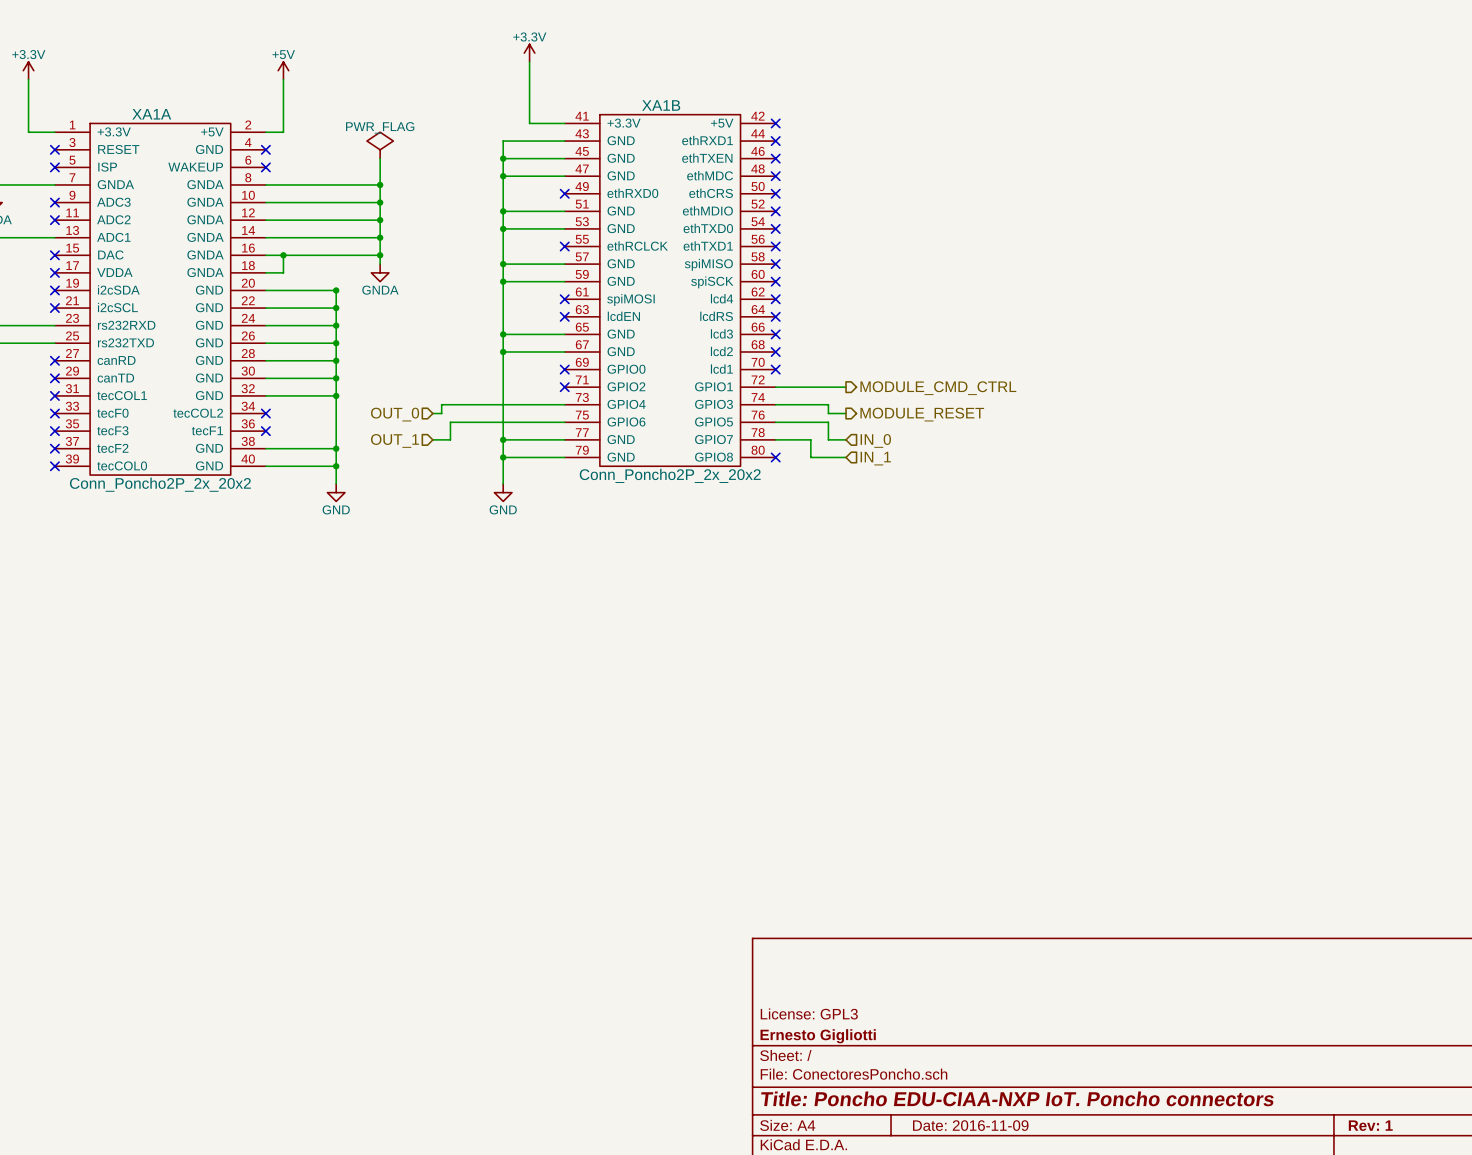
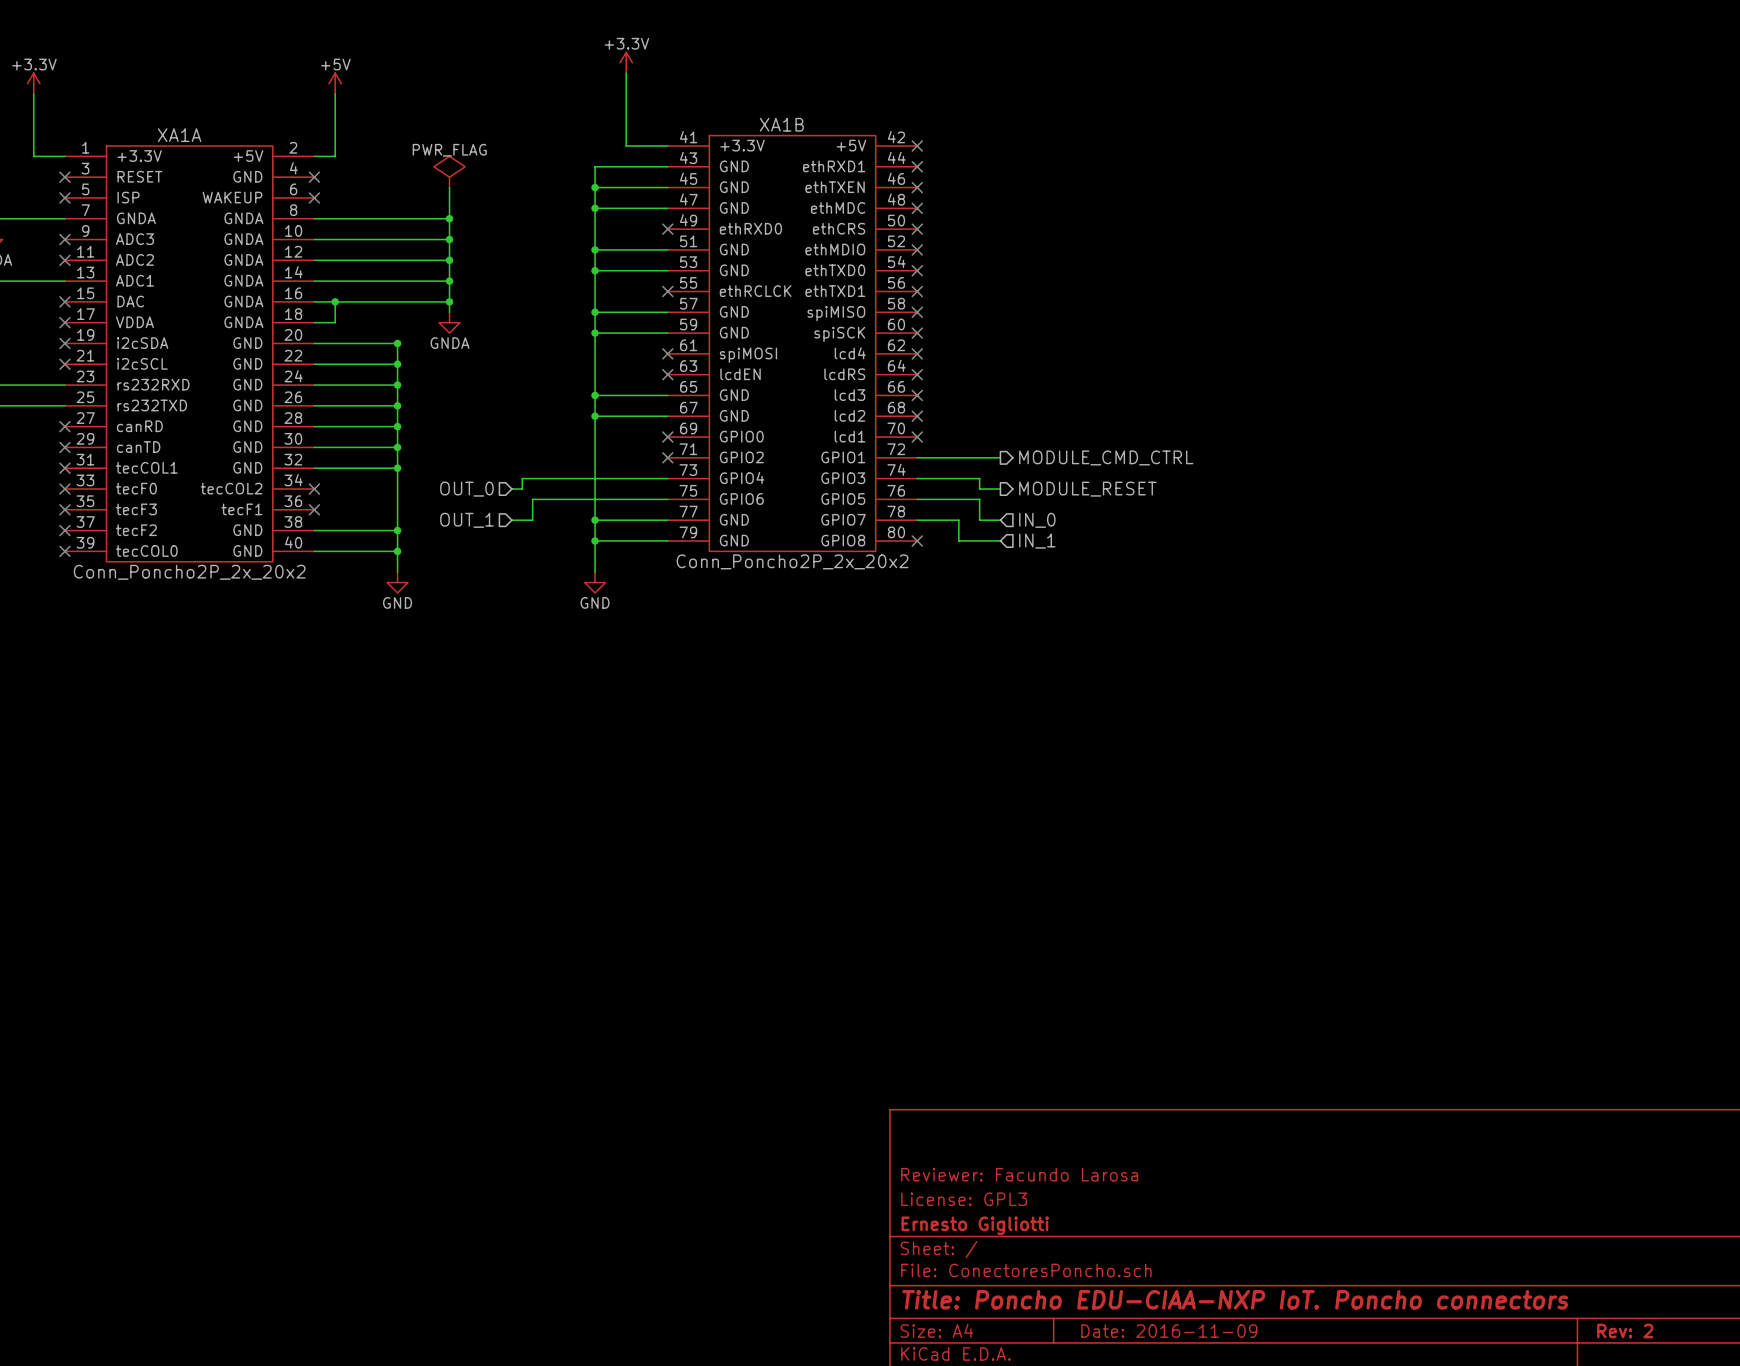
title block: none -> Reviewer: Facundo Larosa (1019, 1174)
title block: Rev: 1 (1370, 1125) -> Rev: 2 (1625, 1331)

